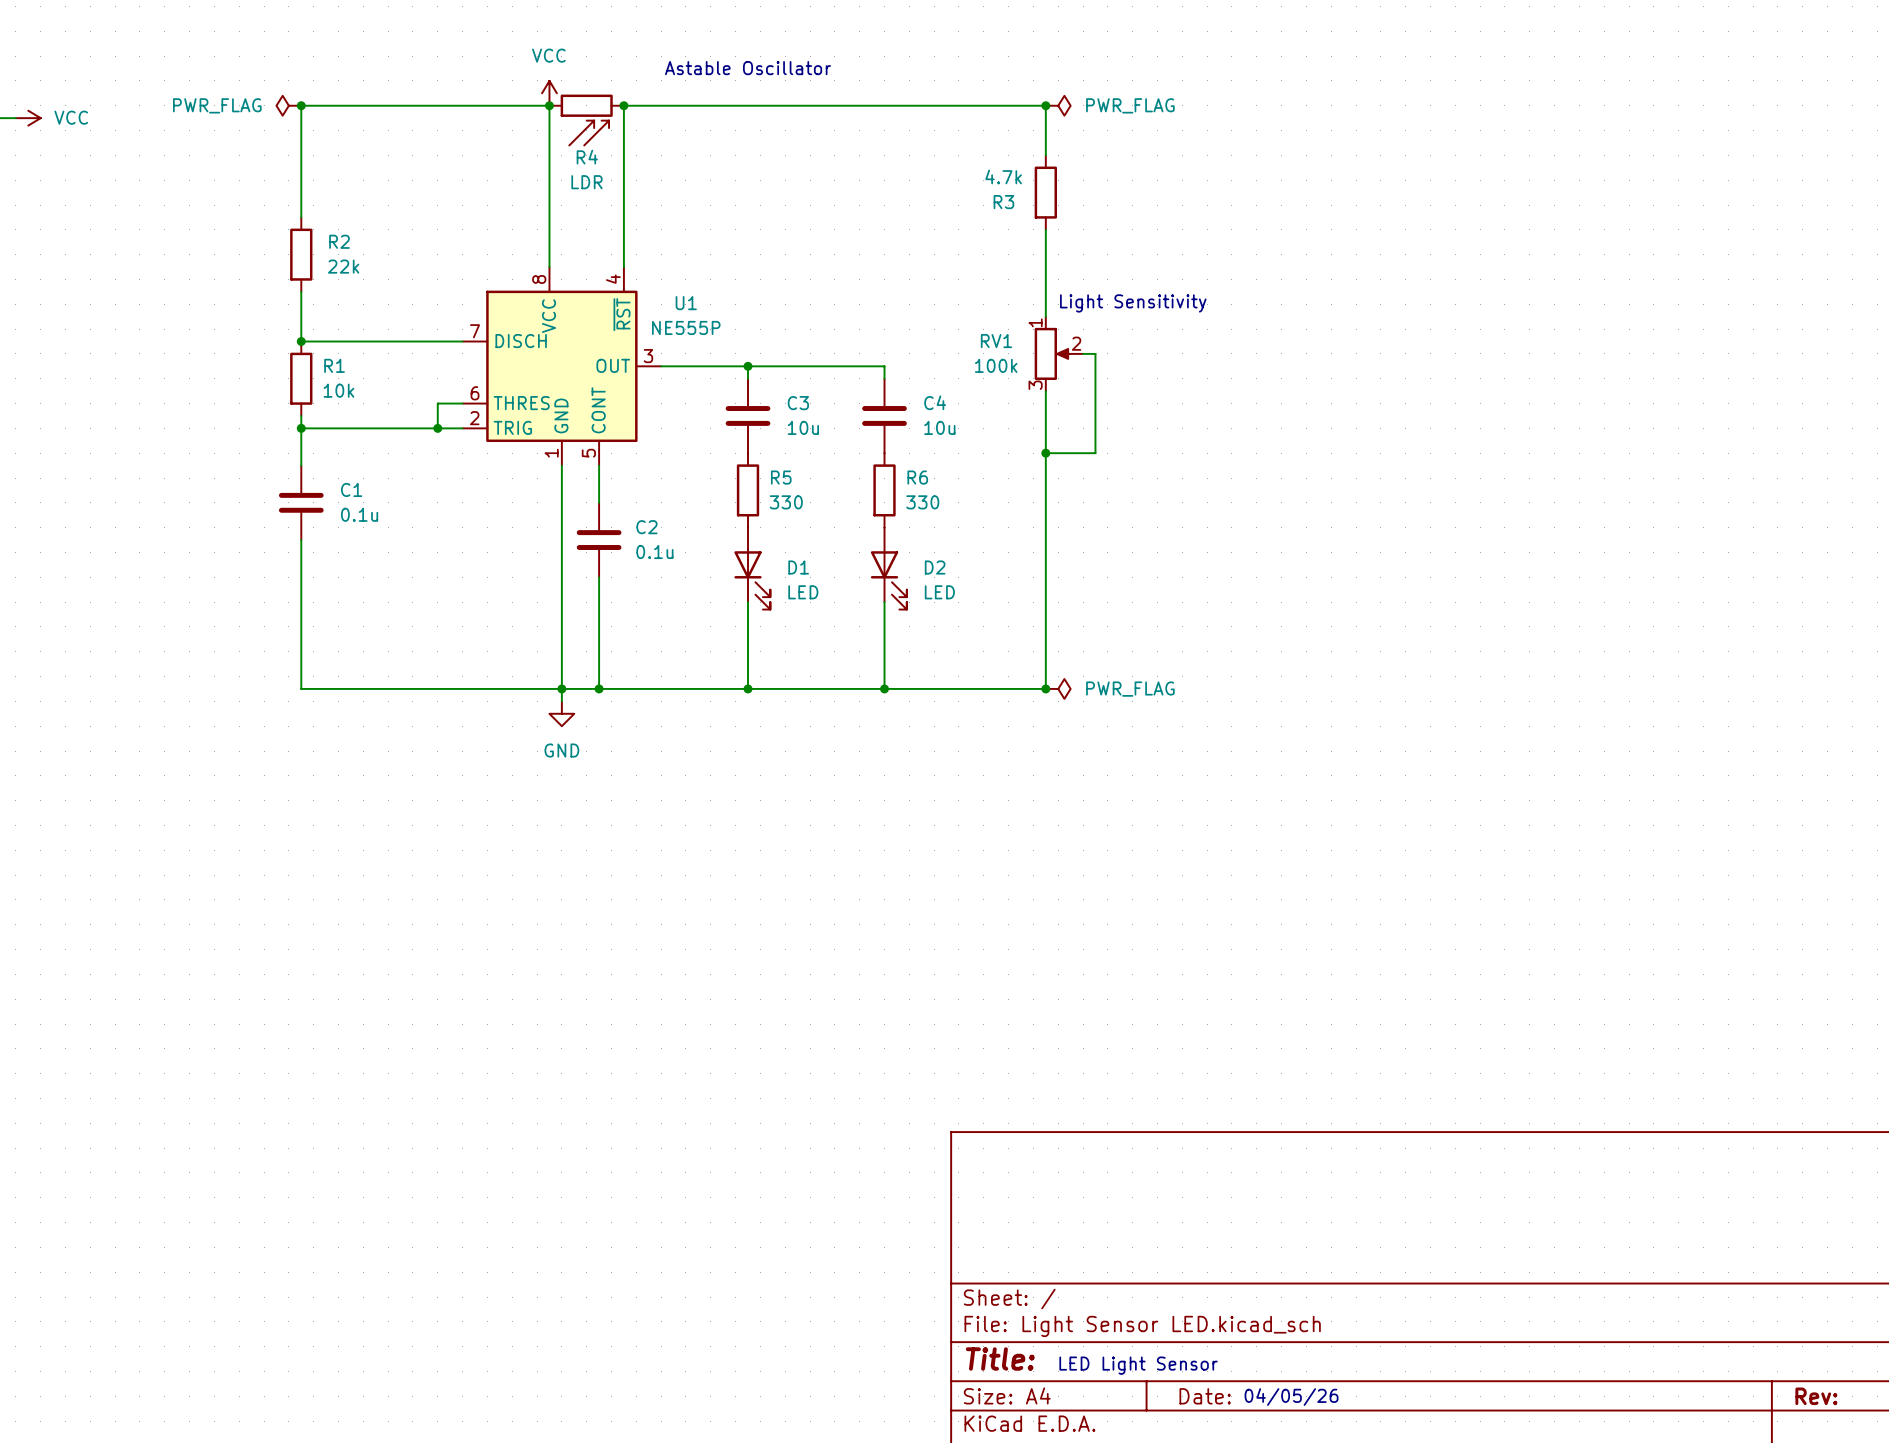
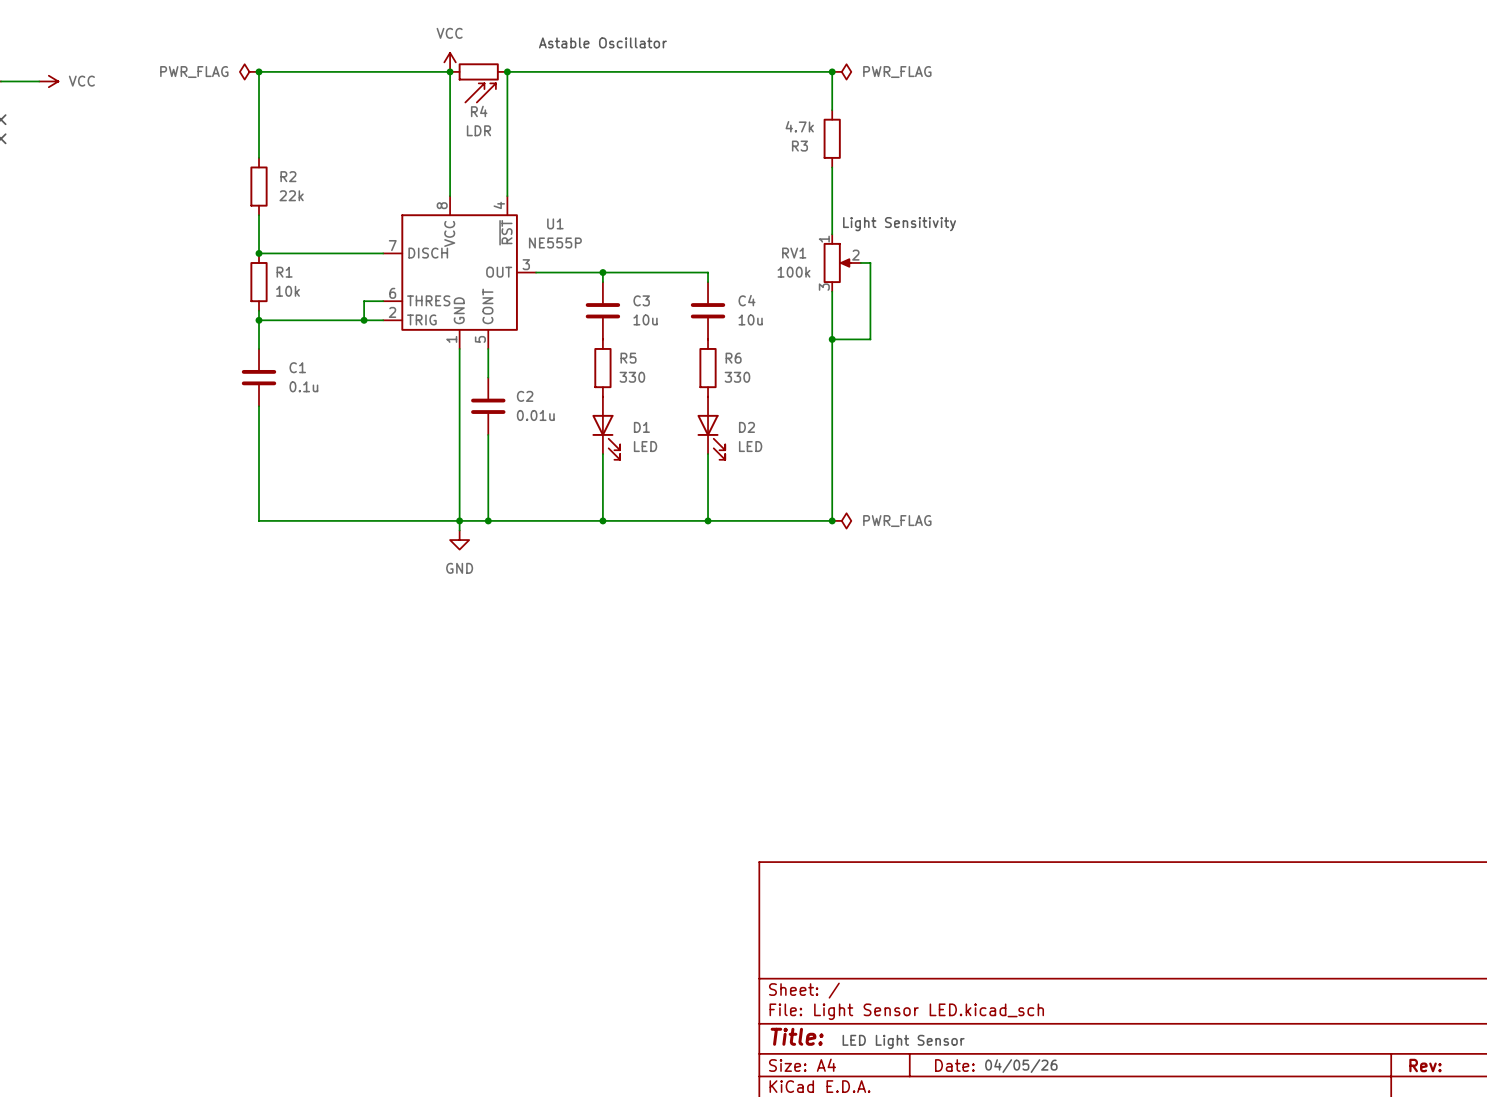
C2 value: 0.1u (654, 552) -> 0.01u (535, 415)

